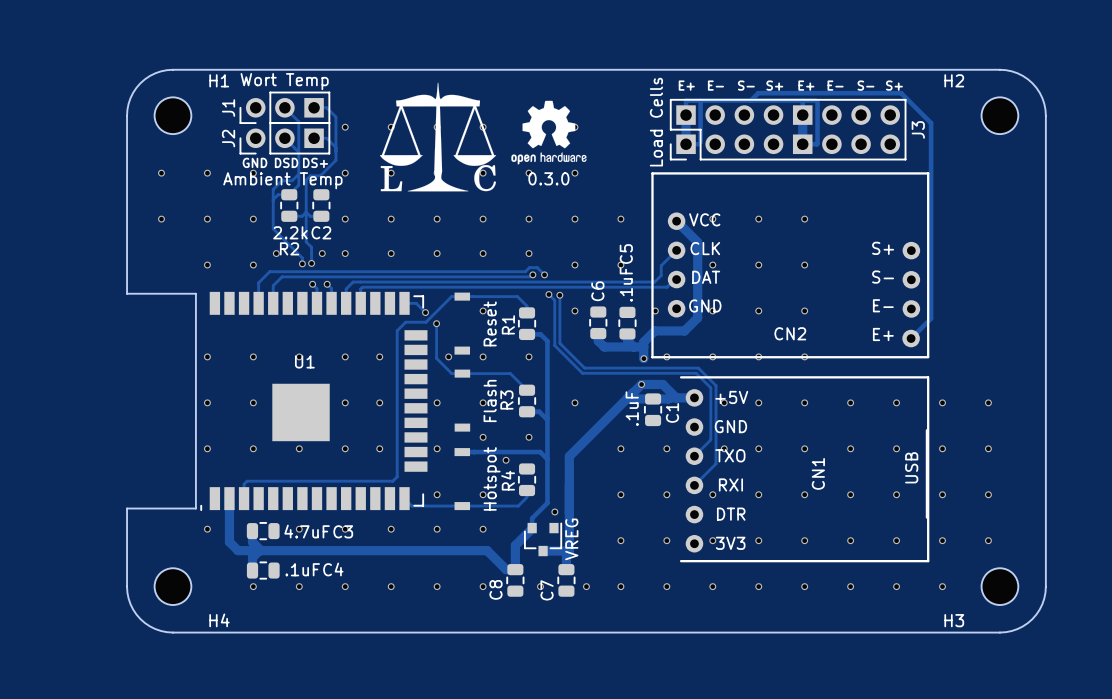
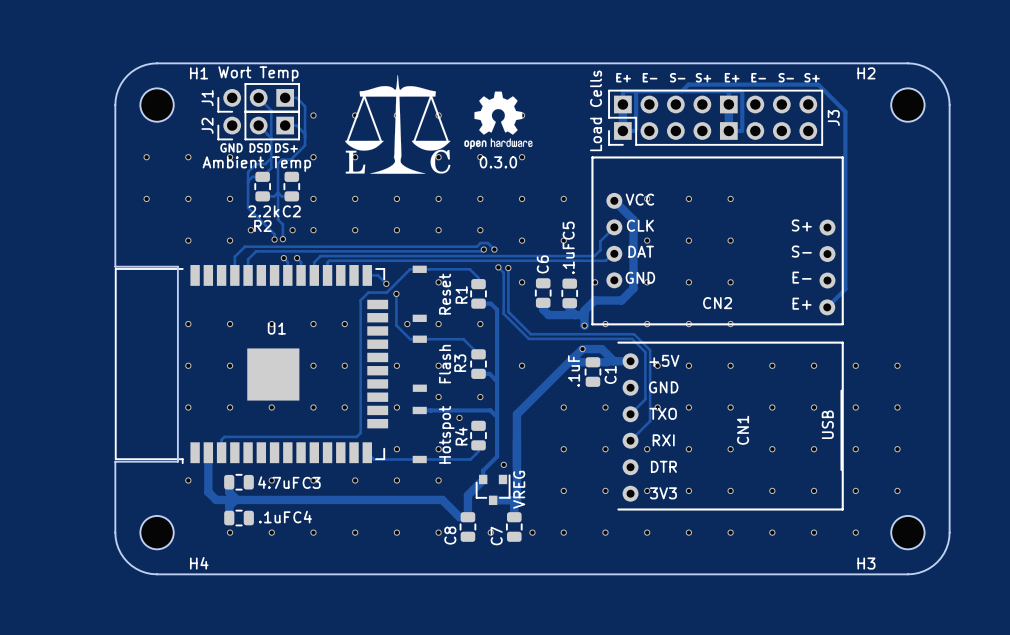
U1 footprint: [200, 291, 428, 511] -> [115, 265, 389, 464]

